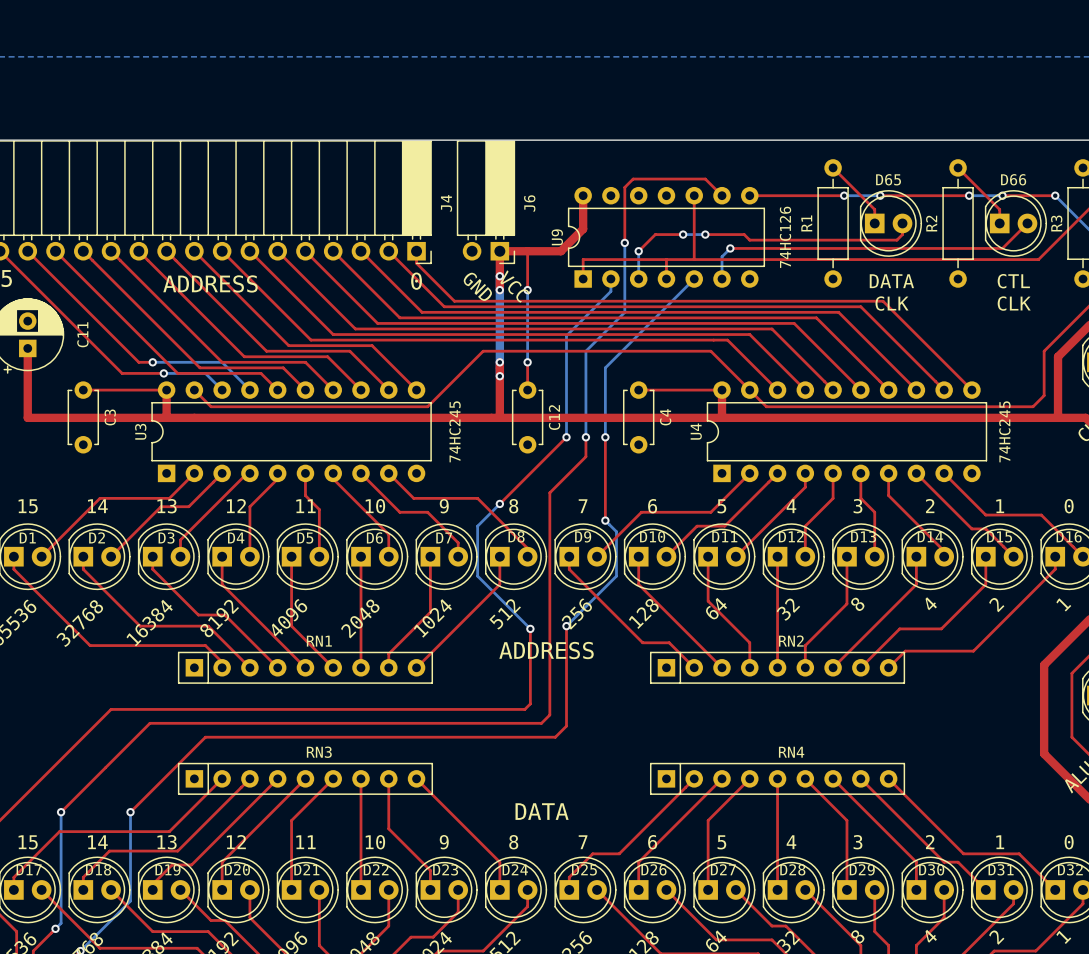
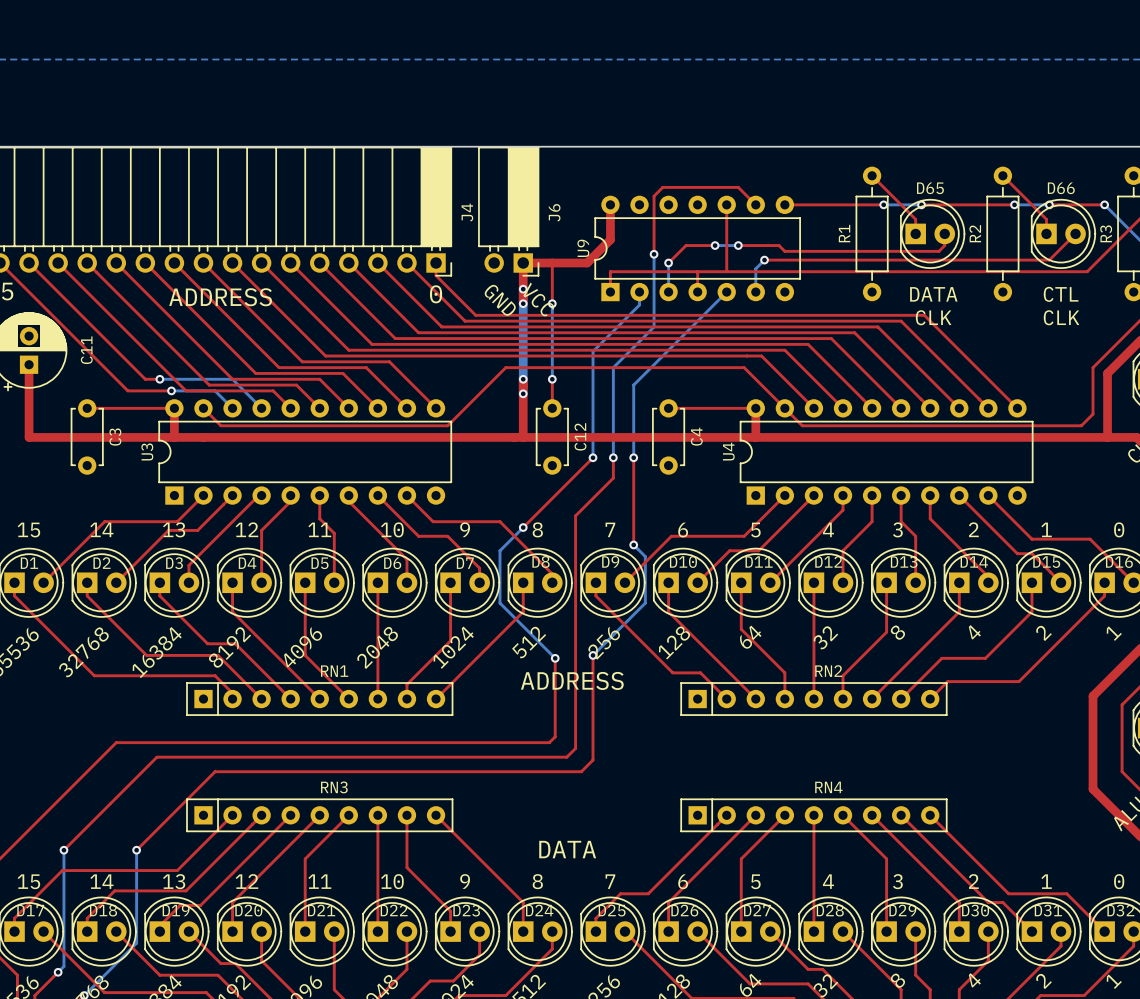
U9 value: 74HC126 (785, 237) -> none
U3 value: 74HC245 (455, 431) -> none
U4 value: 74HC245 (1004, 431) -> none

